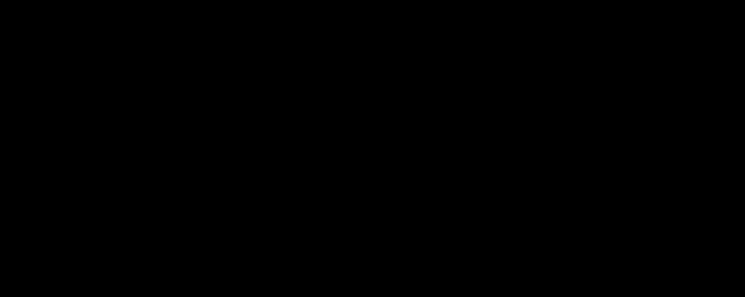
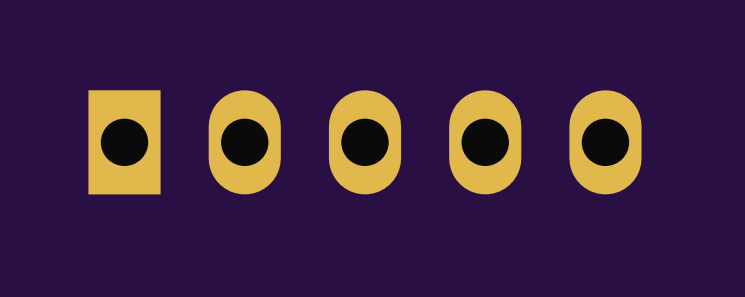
part: none -> (364, 142)

